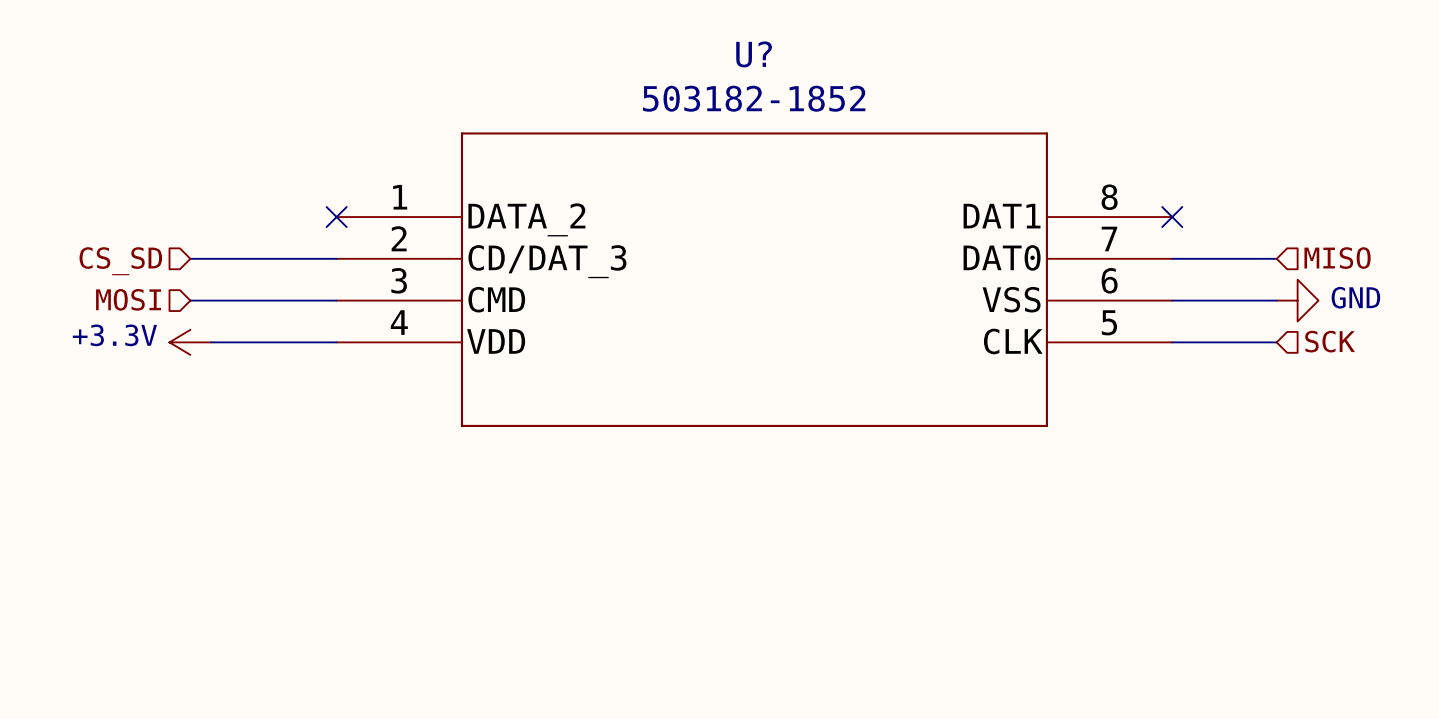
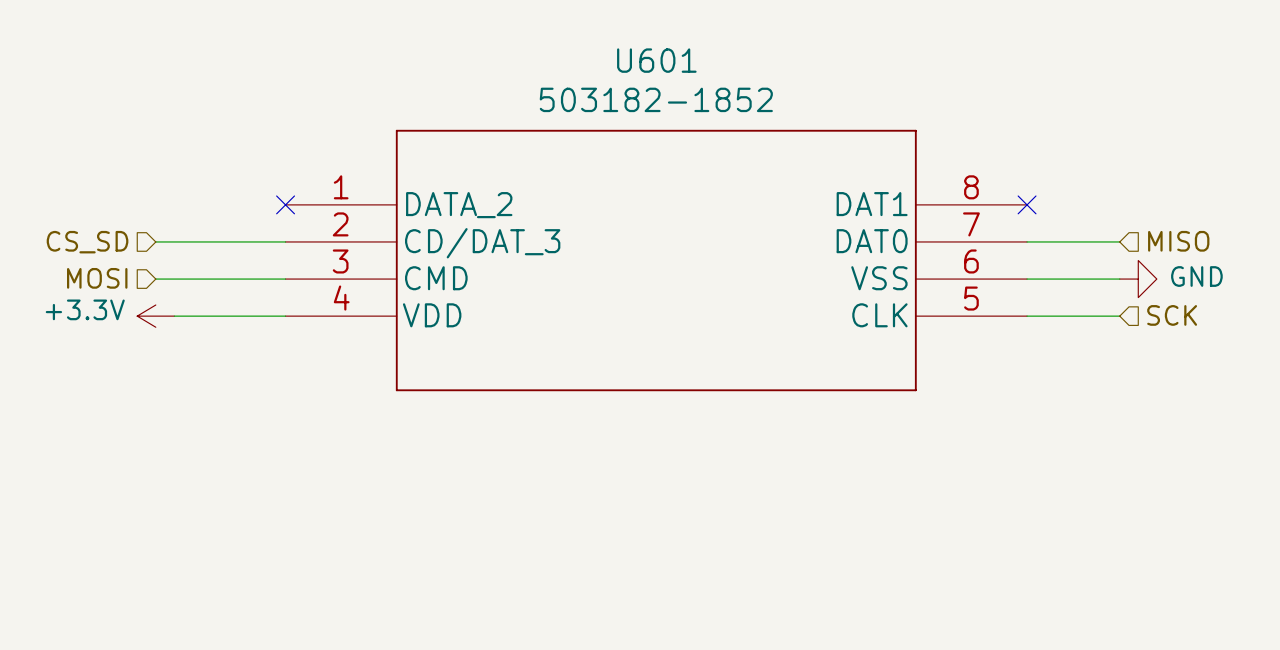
U? name: U? (754, 54) -> U601 (656, 60)

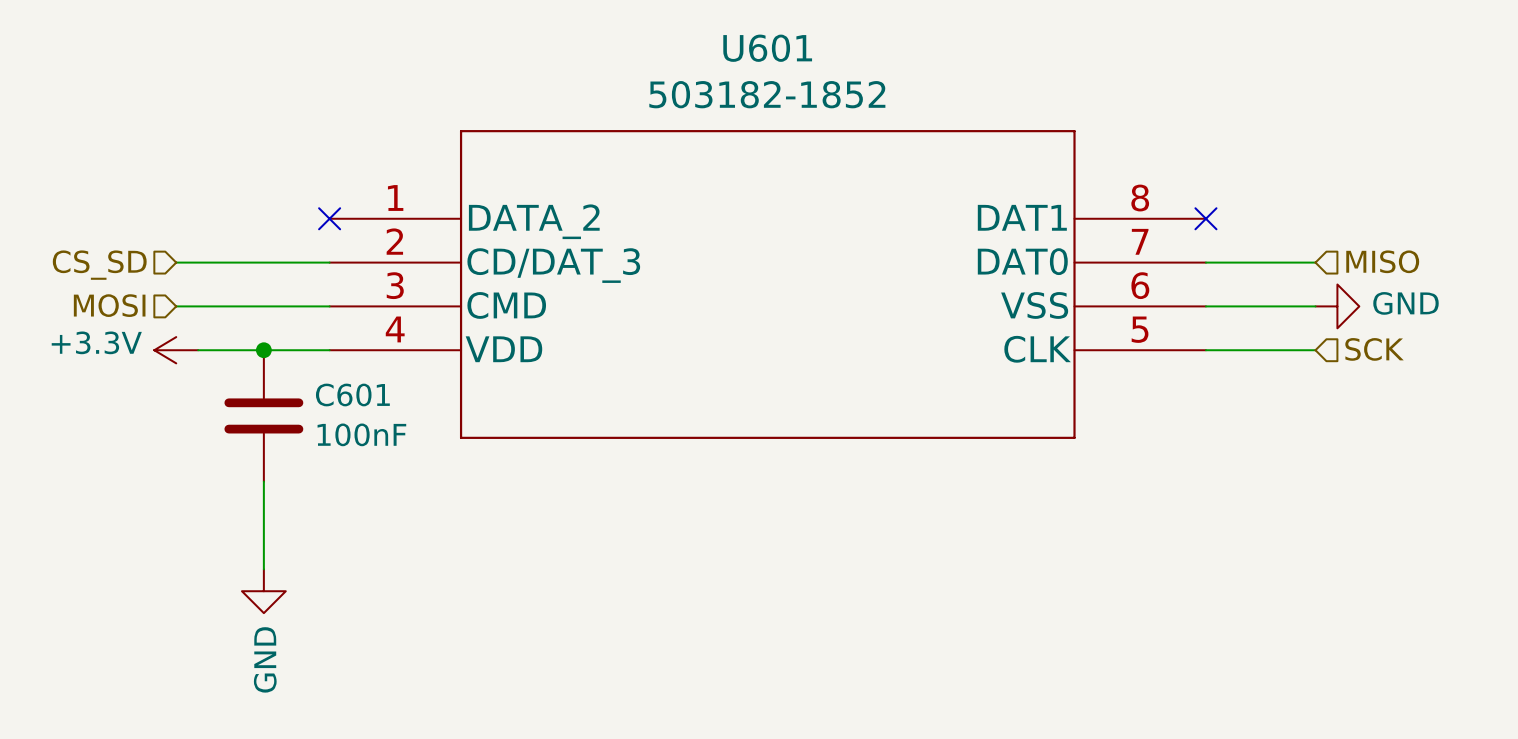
junction: none -> (263, 350)
C601: none -> 100nF (263, 415)
wire: none -> (263, 481) (263, 569)
power symbol: none -> GND (263, 591)

